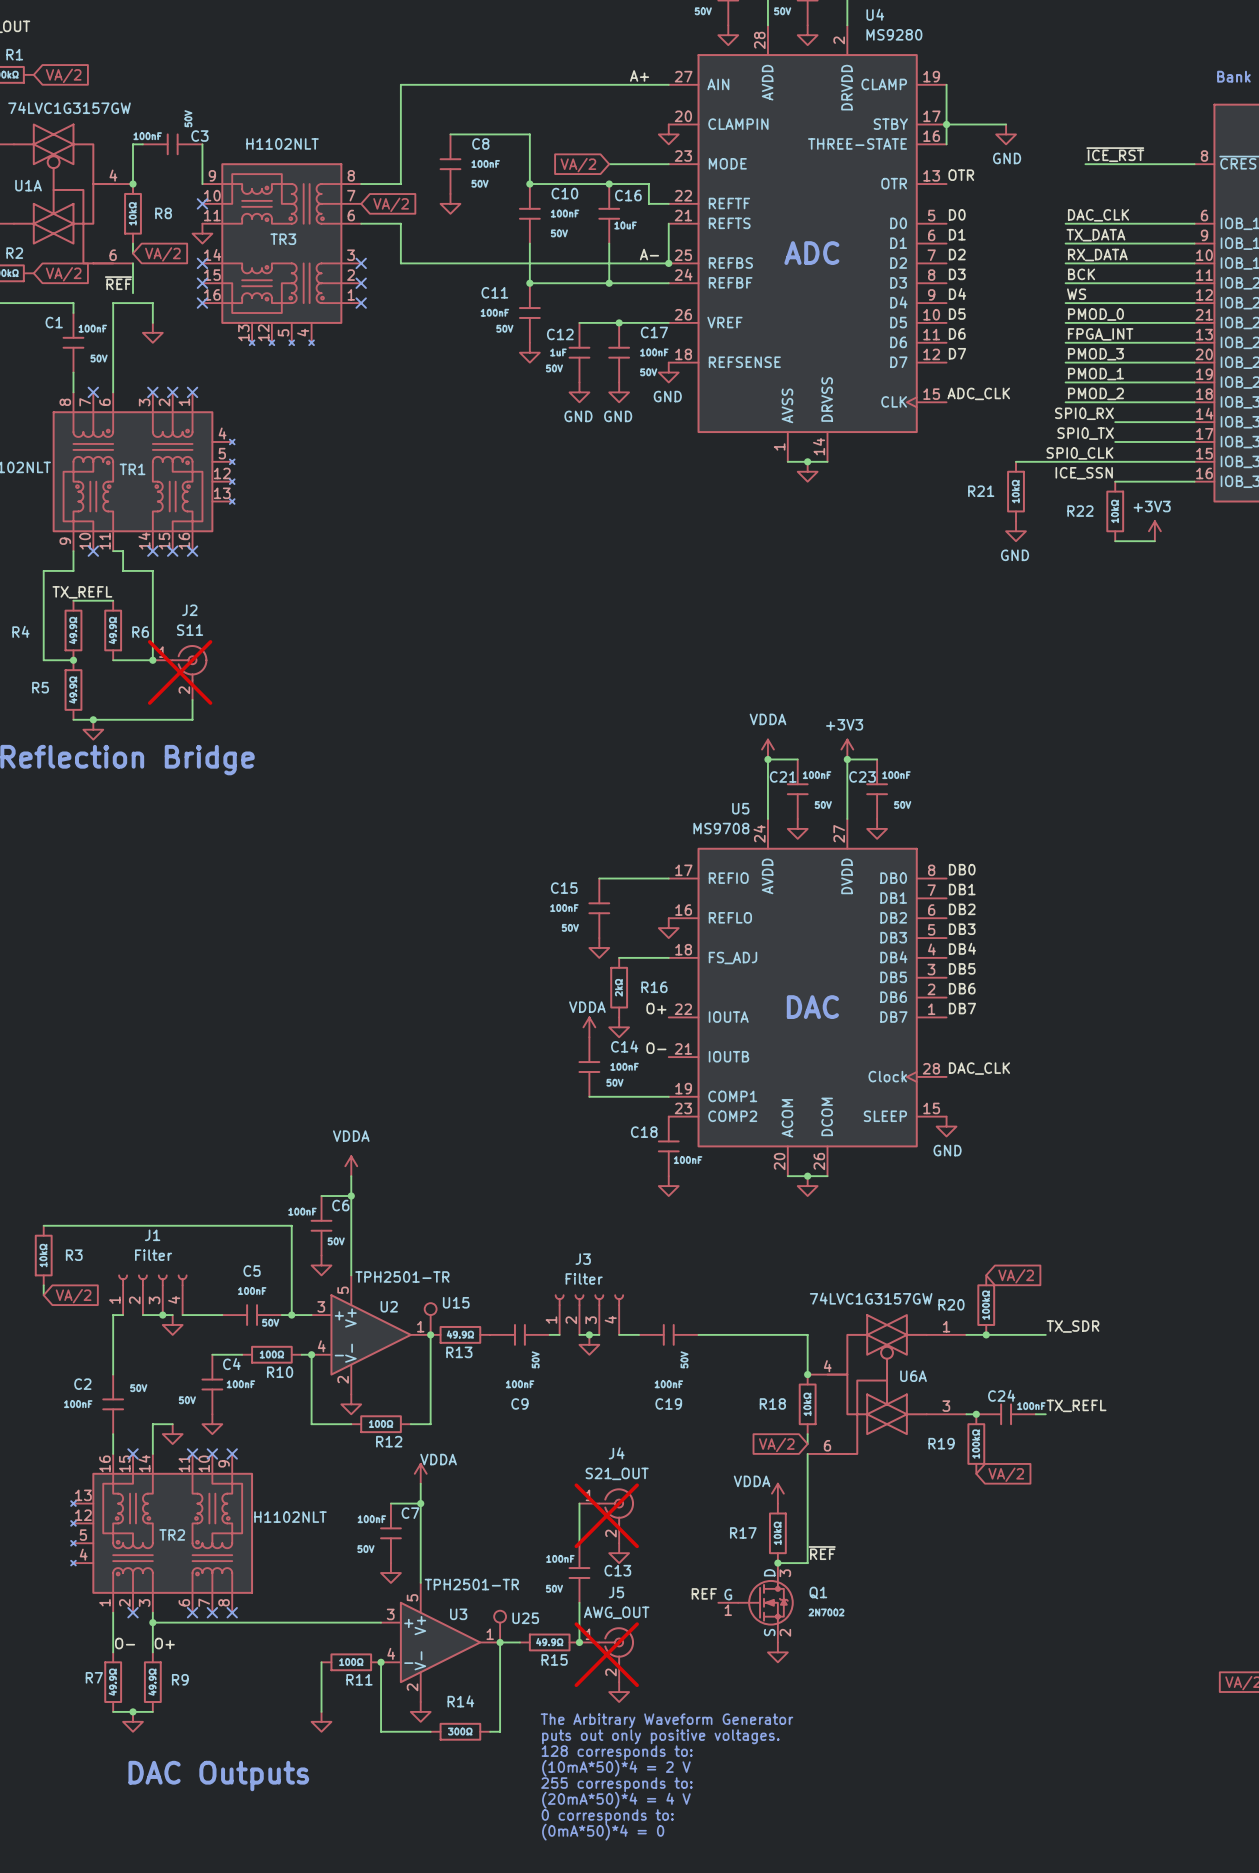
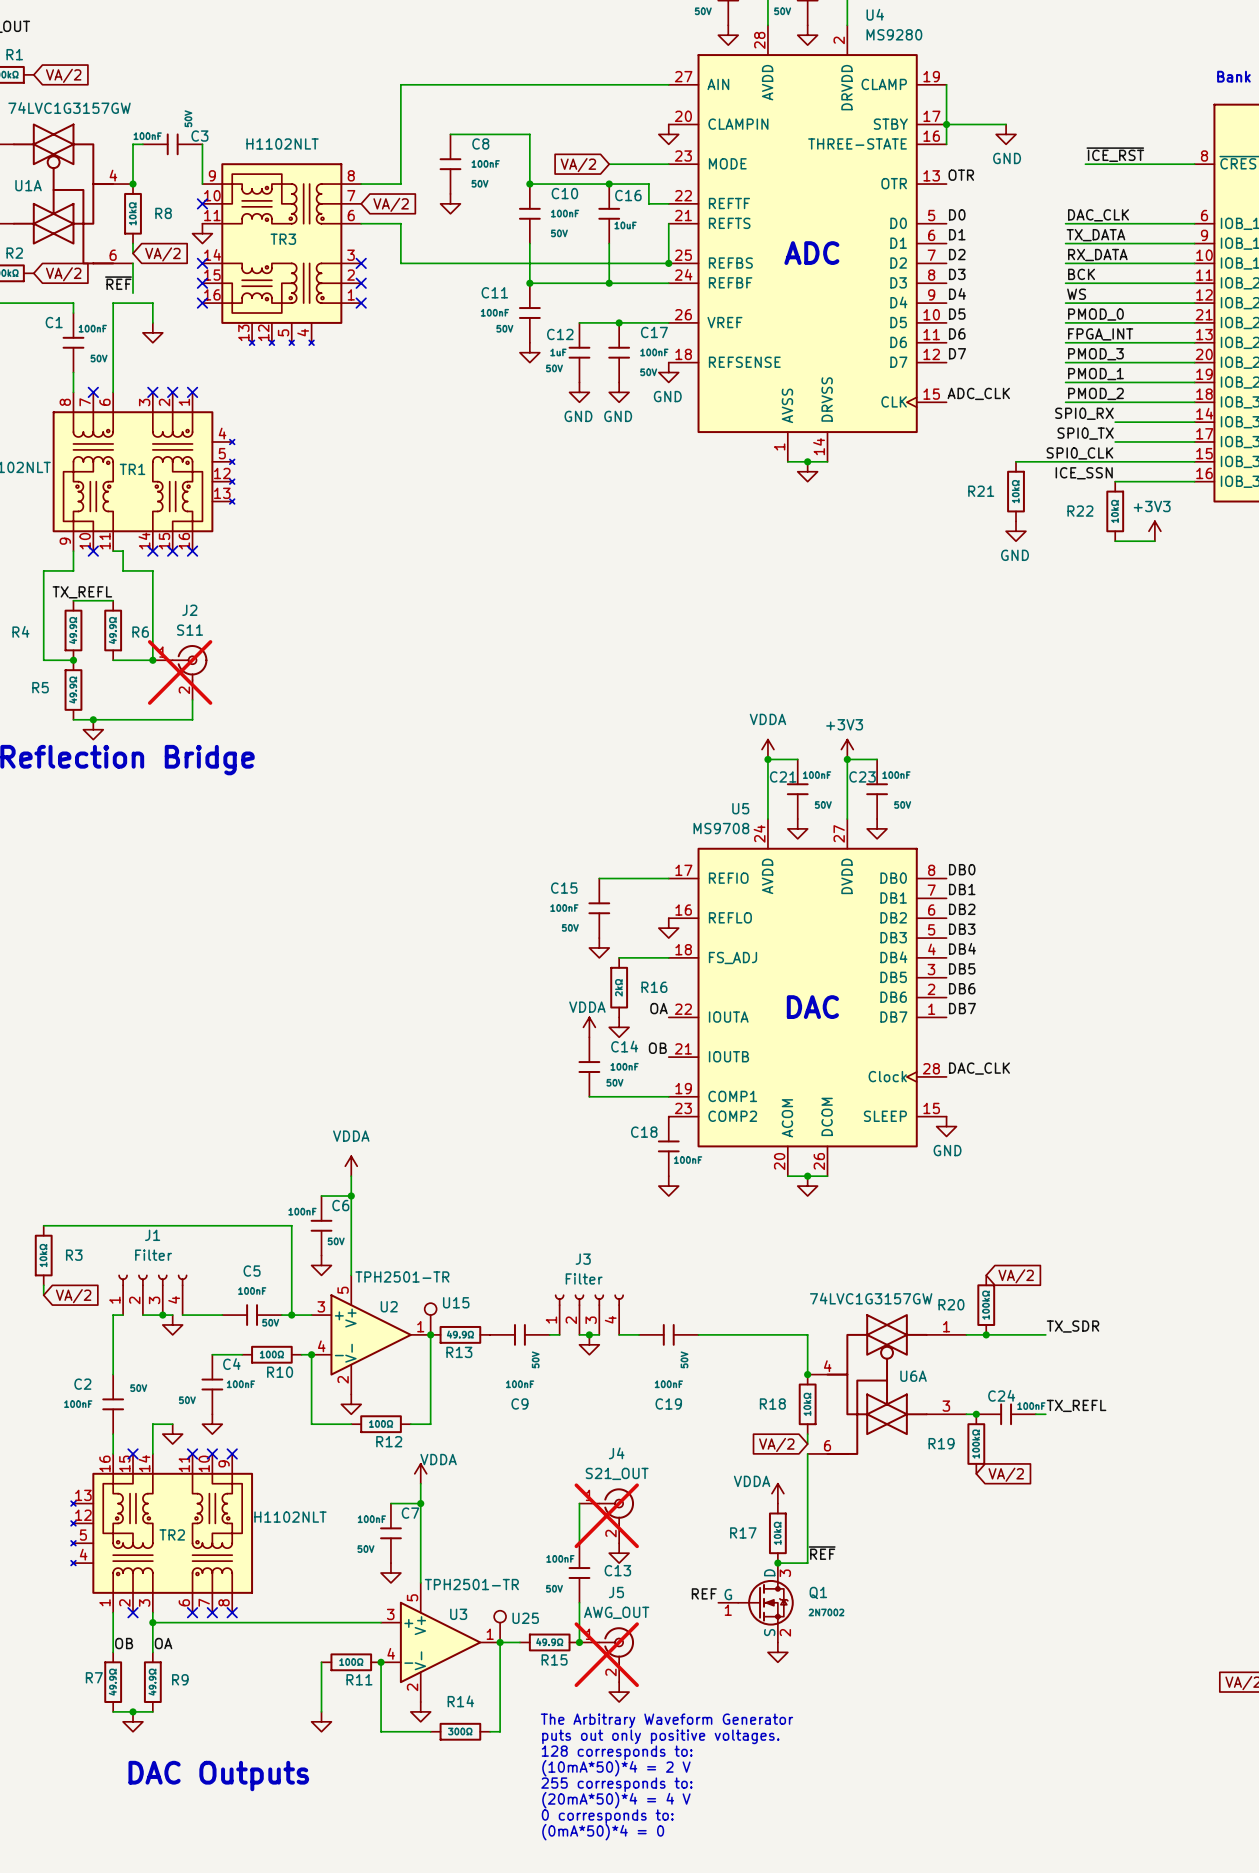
label: A+ (639, 75) -> none
label: A- (649, 254) -> none
label: O+ (656, 1008) -> OA (659, 1008)
label: O- (656, 1048) -> OB (657, 1048)
label: O- (125, 1643) -> OB (124, 1643)
label: O+ (164, 1643) -> OA (163, 1643)

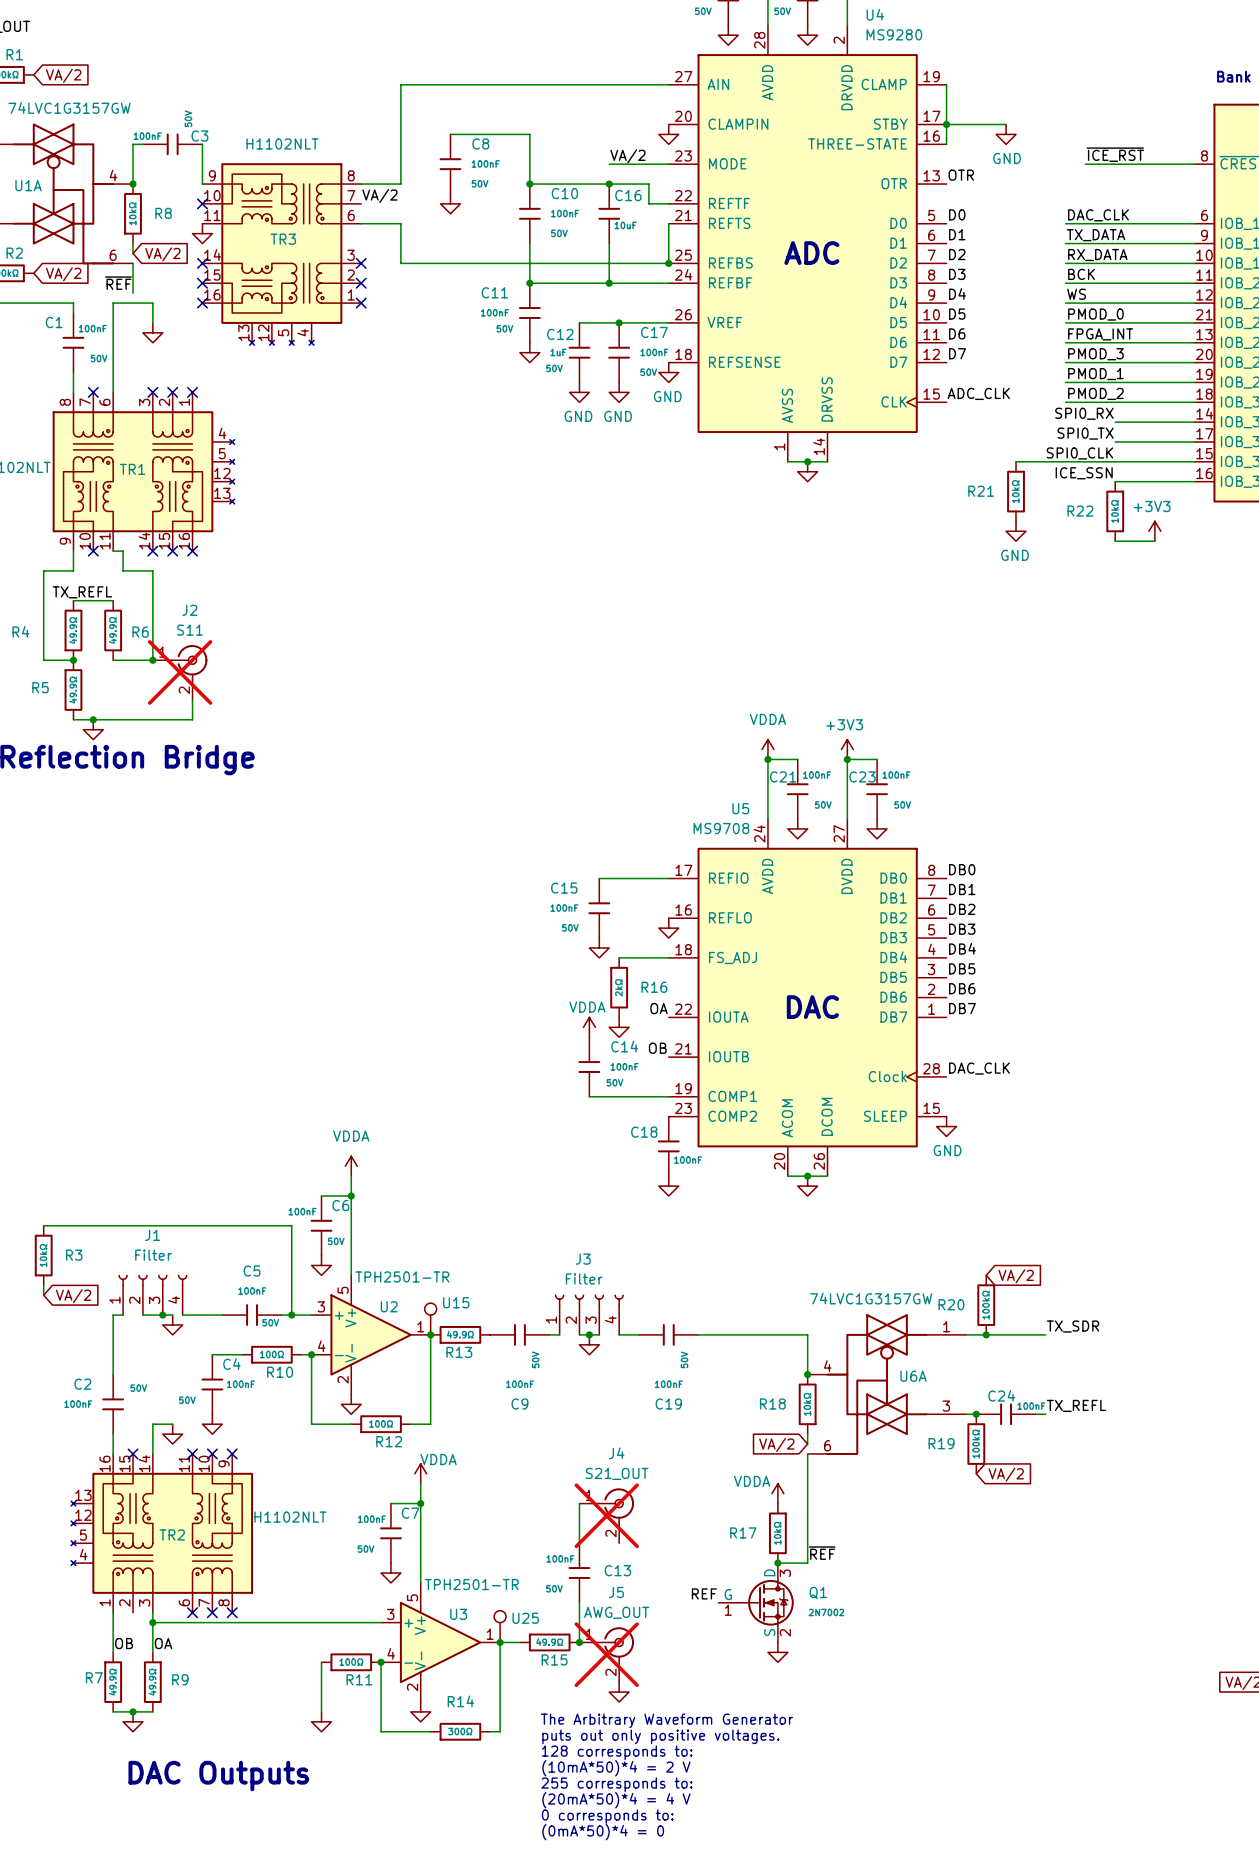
label: none -> VA/2 (627, 156)
global label: VA/2 (578, 165) -> none
label: none -> VA/2 (379, 195)
global label: VA/2 (391, 204) -> none
power symbol: (619, 1553) -> none
no-connect mark: (133, 1612) -> none

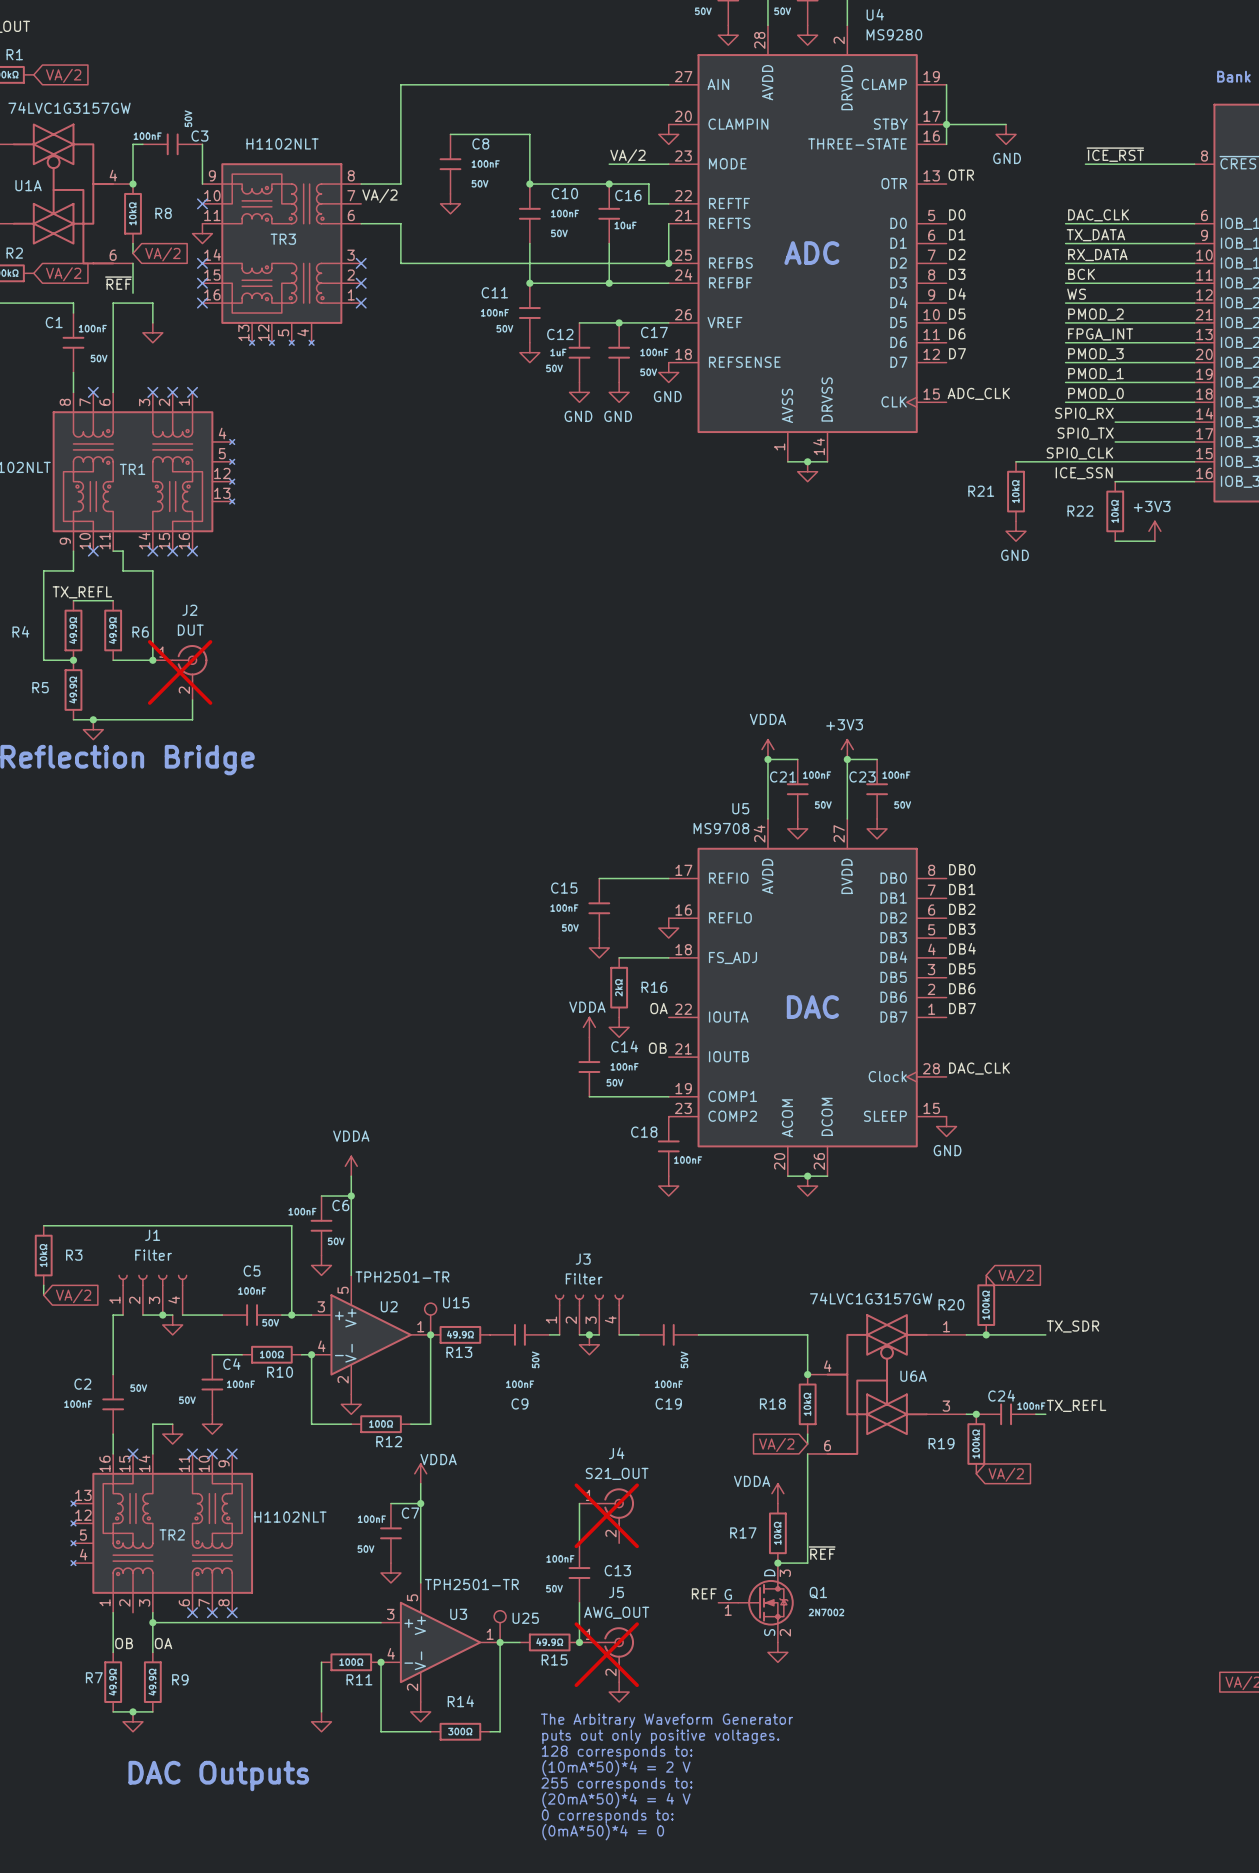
label: PMOD_0 (1095, 314) -> PMOD_2 (1095, 314)
label: PMOD_2 (1095, 393) -> PMOD_0 (1095, 393)
J2 value: S11 (190, 630) -> DUT (190, 630)

